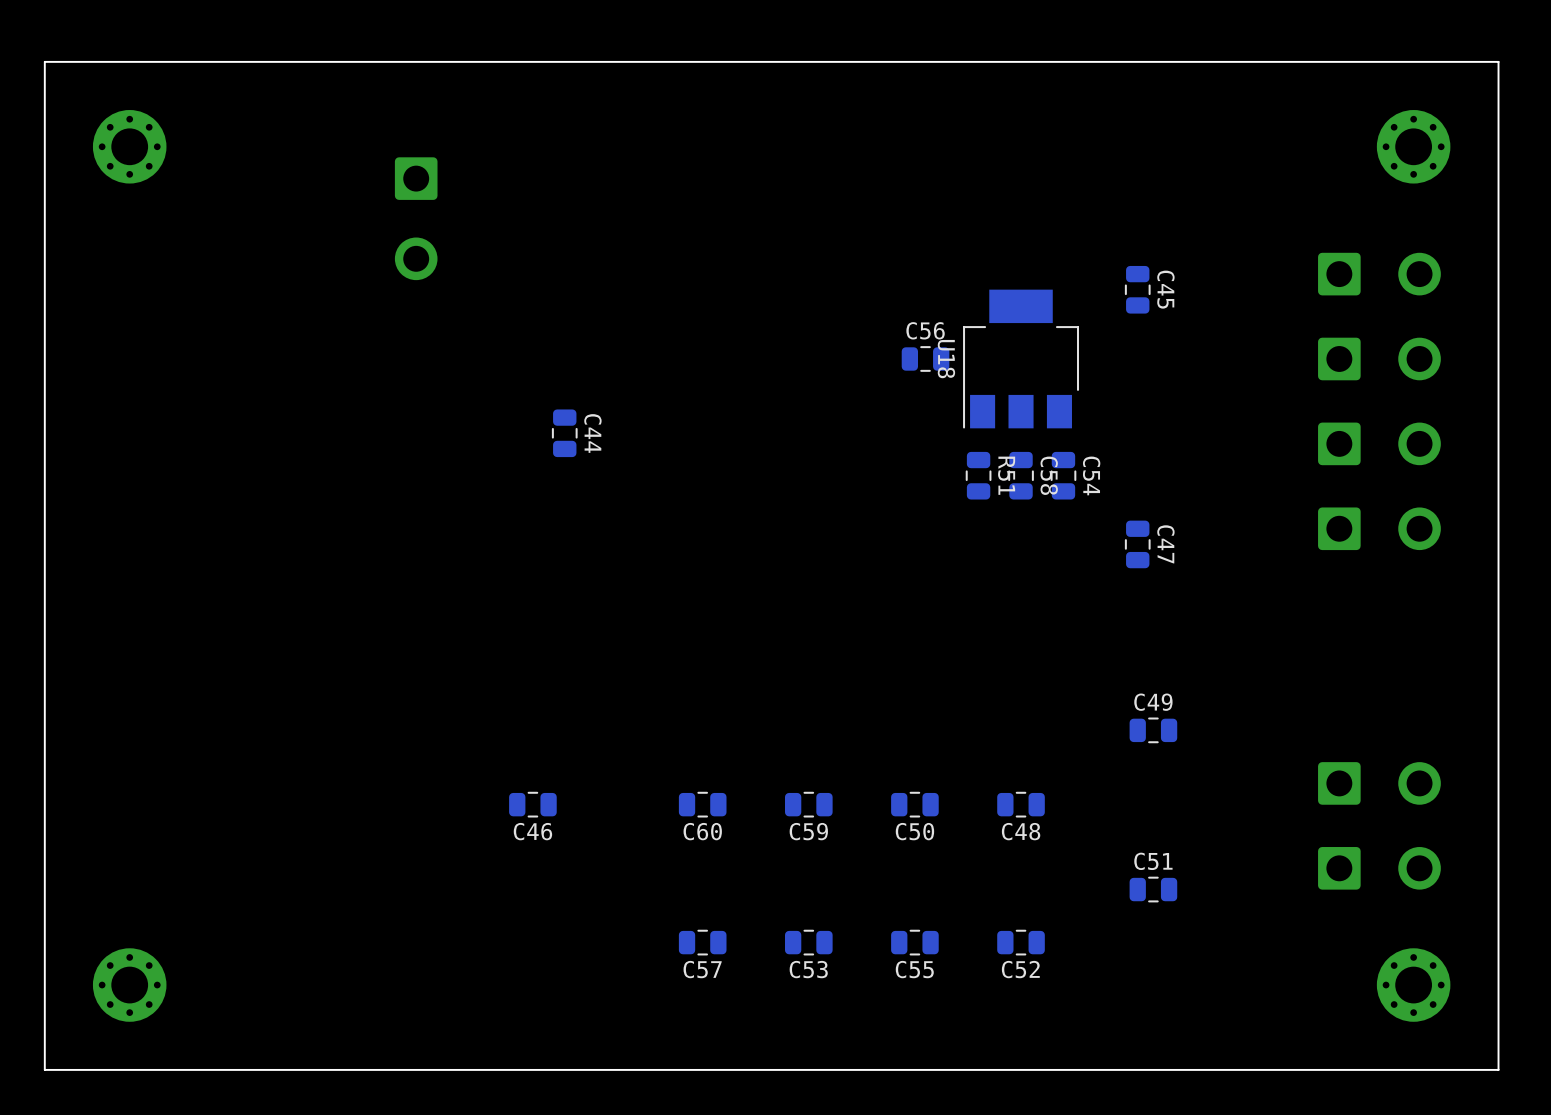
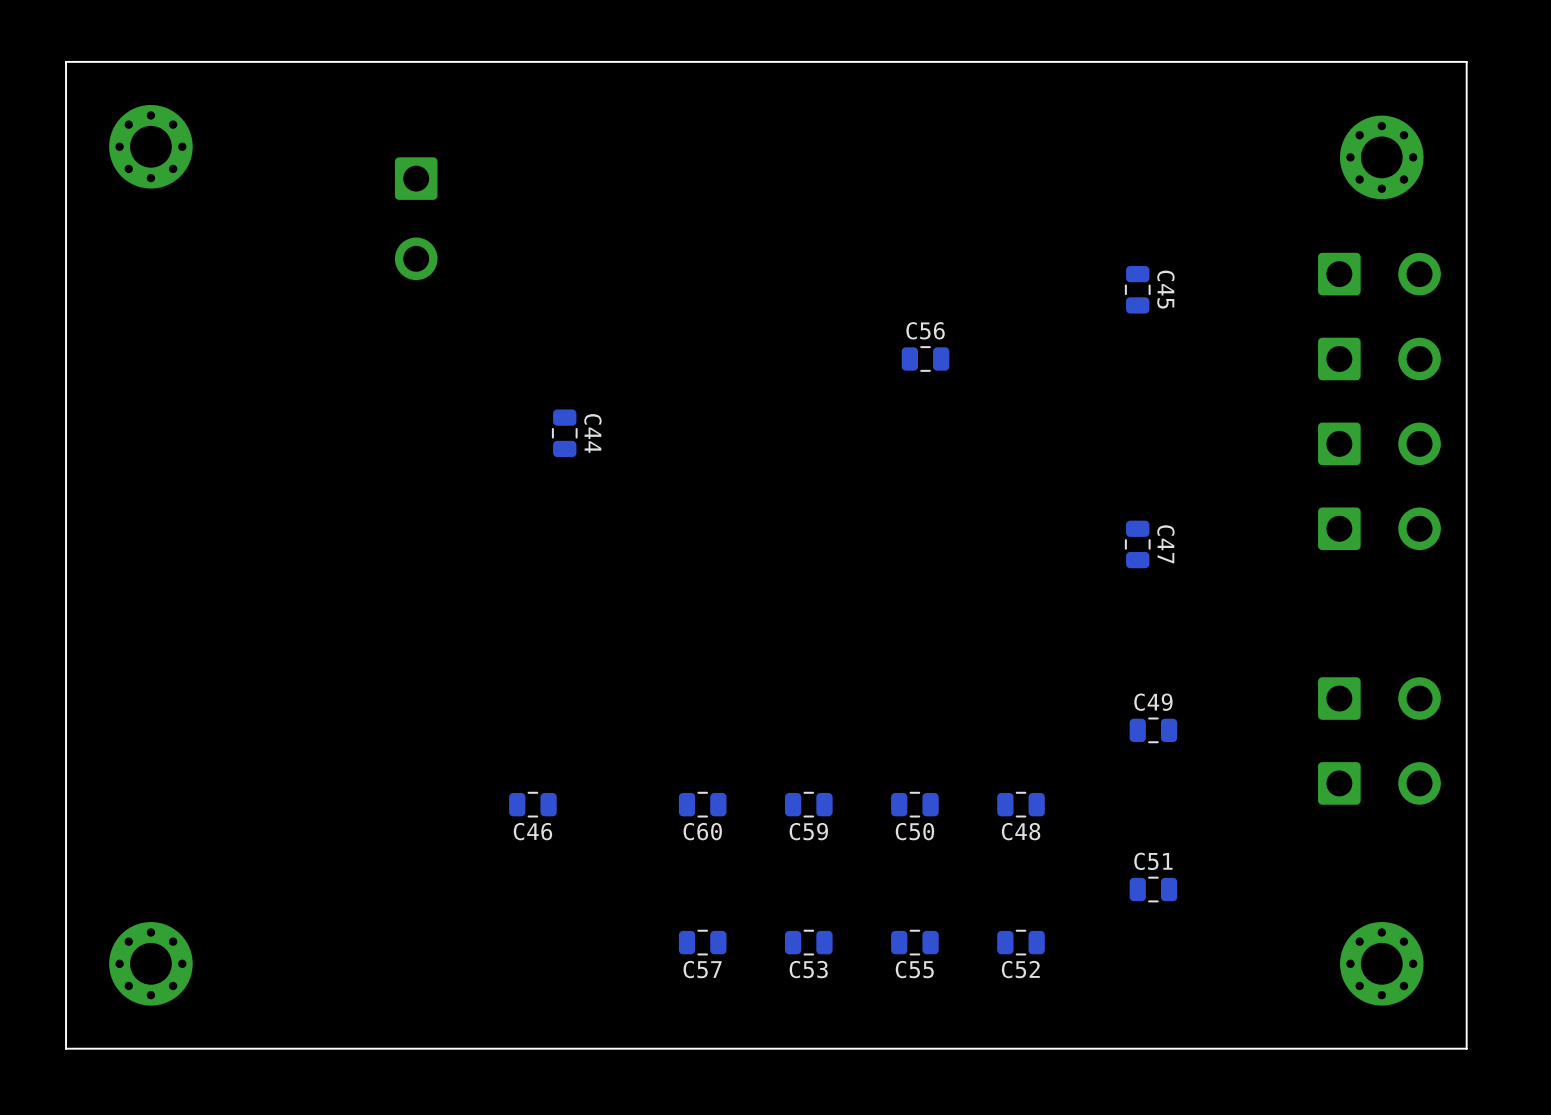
board edge: (1466, 61) (1498, 61) (1498, 1069) (44, 1069) (44, 61) (66, 61) -> (1466, 61) (1466, 1048) (66, 1048) (66, 61)
part: (129, 146) -> none
part: none -> (150, 146)
part: (1413, 146) -> none
part: none -> (1381, 157)
U18: (1021, 359) -> none
R51: (978, 475) -> none
C58: (1021, 475) -> none
C54: (1063, 475) -> none
part position: (1379, 868) -> (1379, 698)
part: none -> (150, 963)
part: none -> (1381, 963)
part: (129, 985) -> none
part: (1413, 985) -> none

